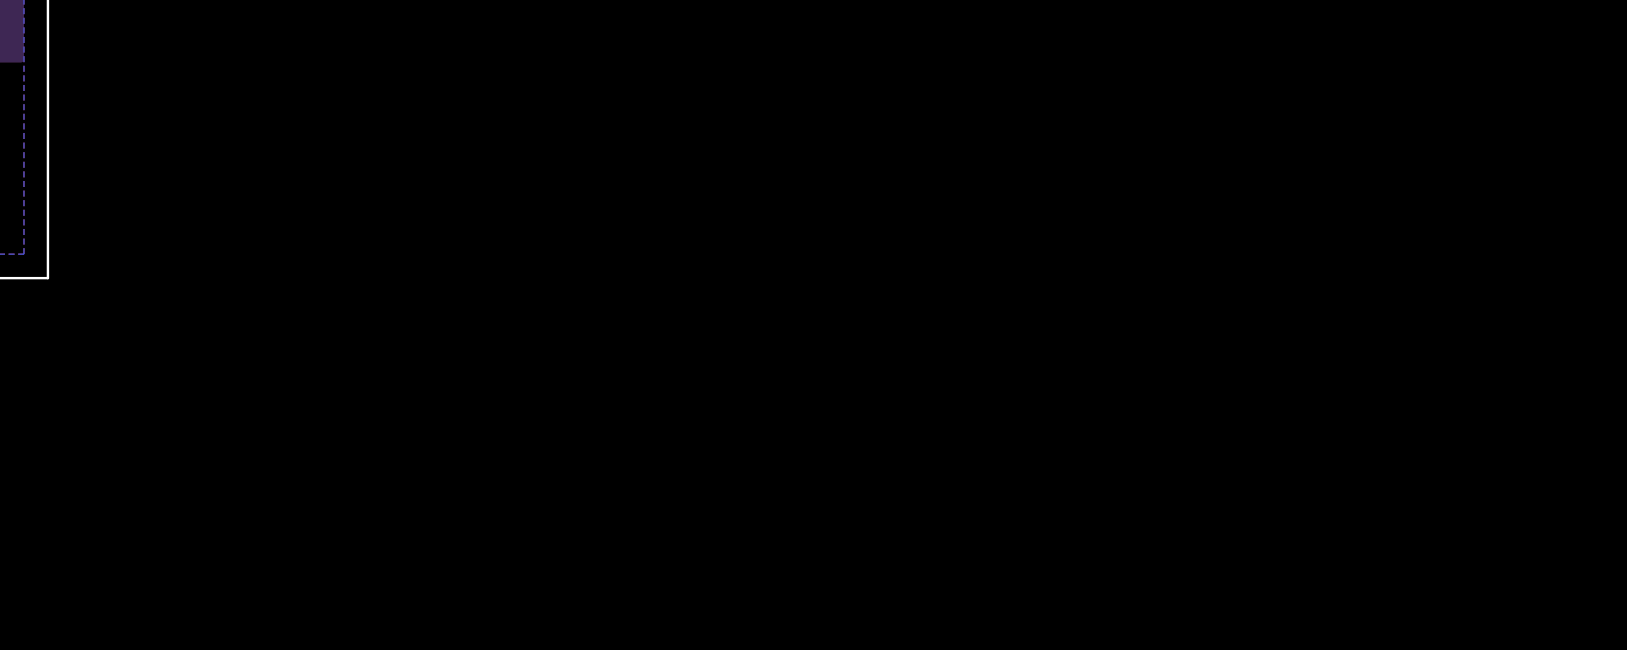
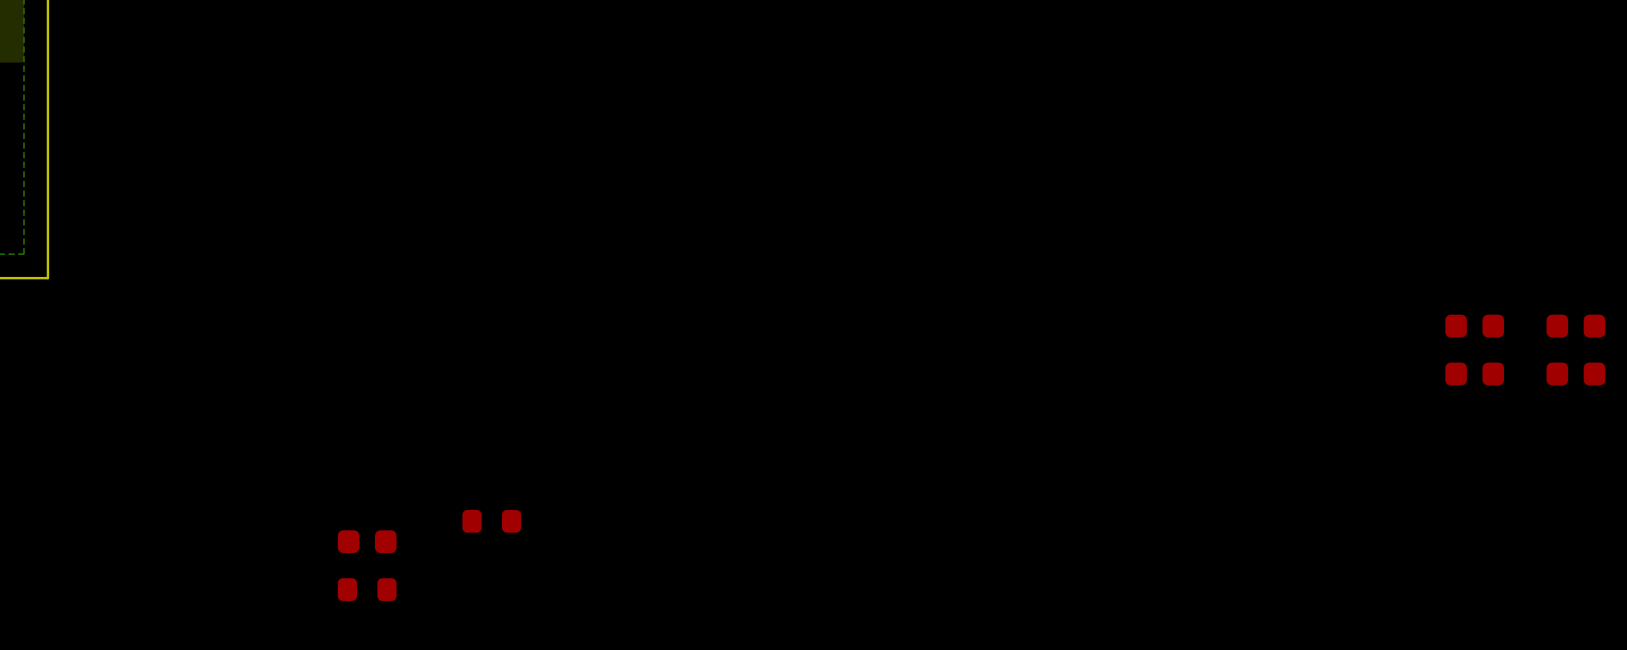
part: none -> (1474, 326)
part: none -> (1575, 326)
part: none -> (1474, 373)
part: none -> (1575, 373)
part: none -> (491, 521)
part: none -> (367, 541)
part: none -> (367, 589)

